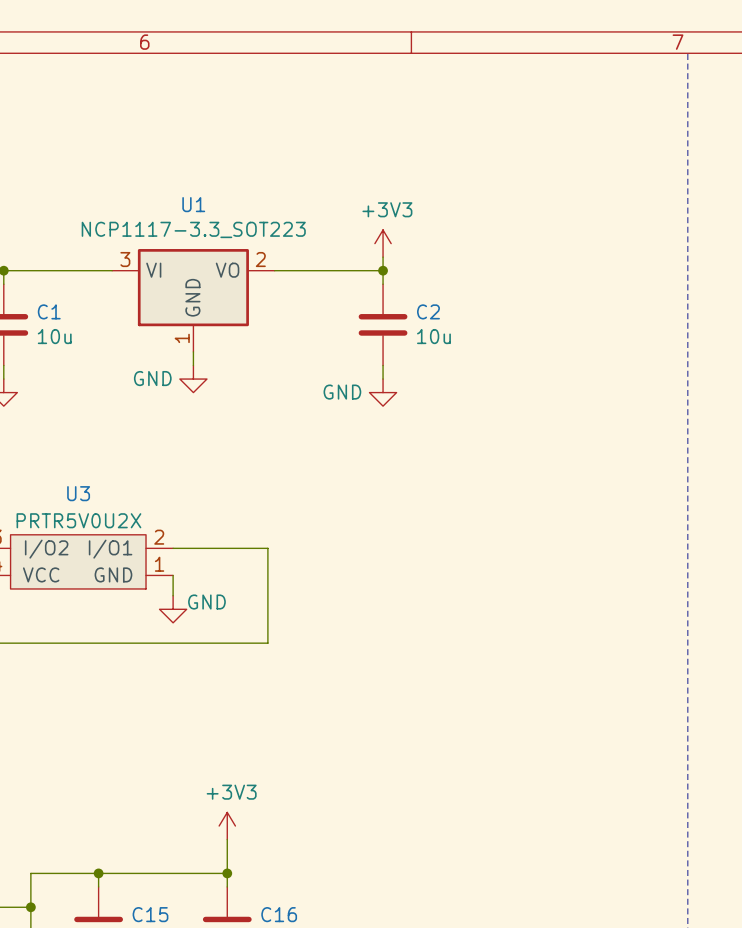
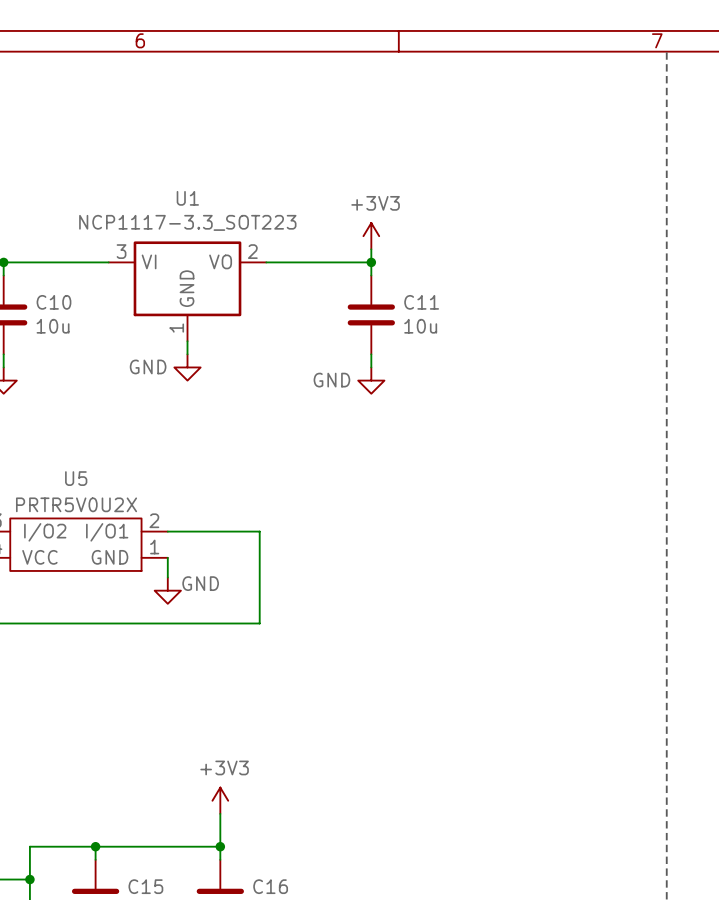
C1 name: C1 (49, 311) -> C10 (53, 302)
C2 name: C2 (428, 311) -> C11 (421, 302)
U3 name: U3 (78, 493) -> U5 (76, 478)

